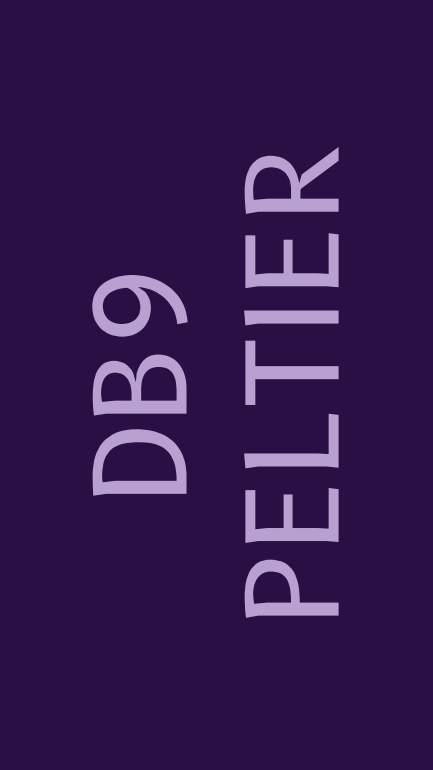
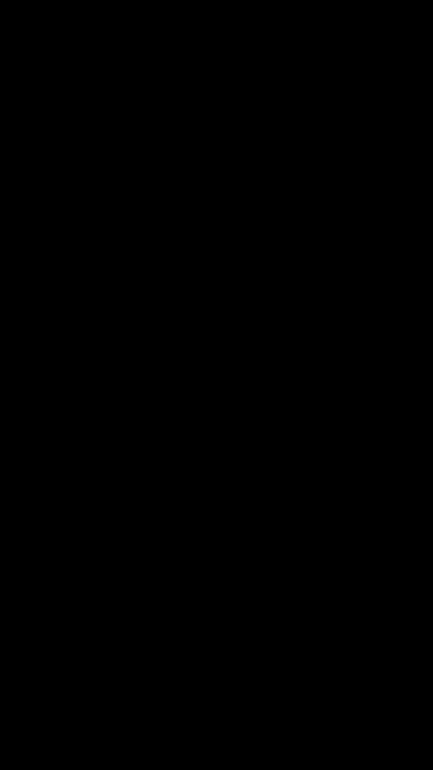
text: PELTIER (291, 382) -> none
text: DB9 (139, 385) -> none

